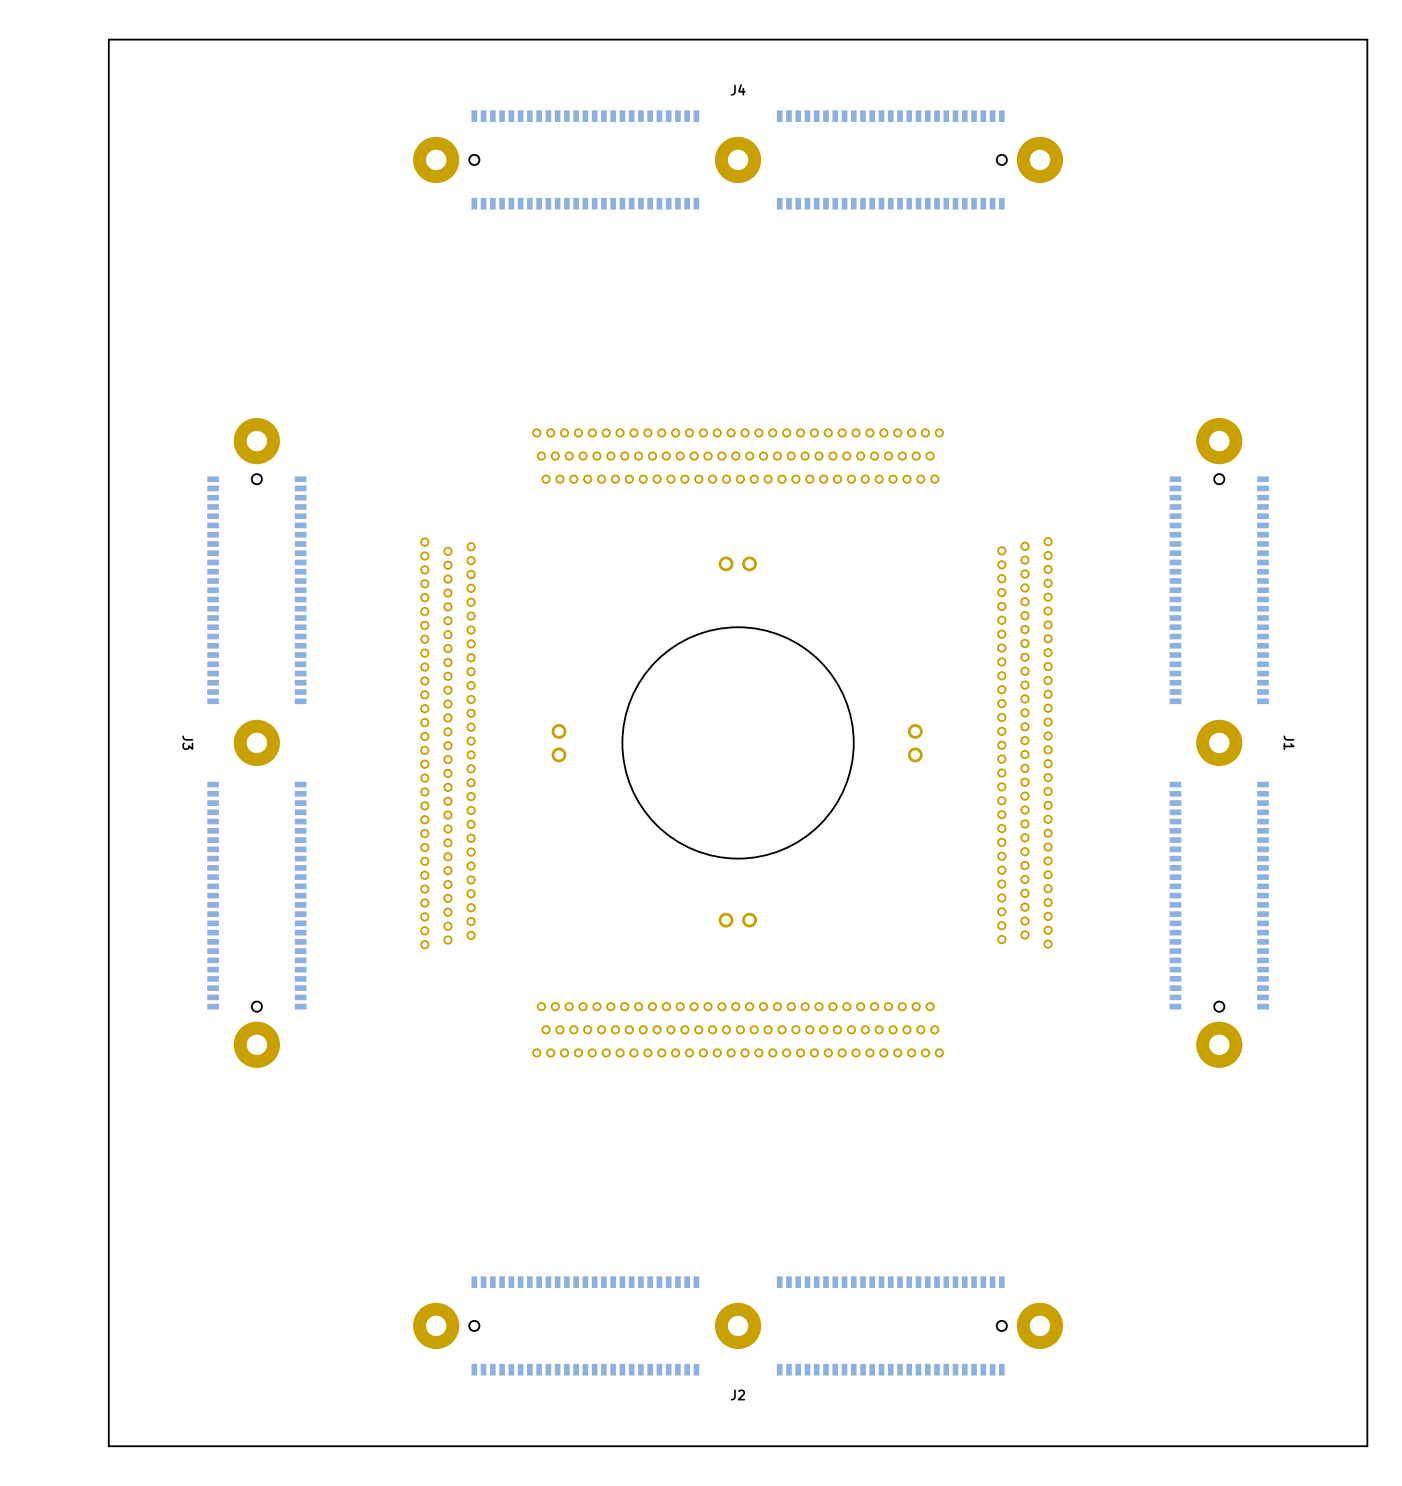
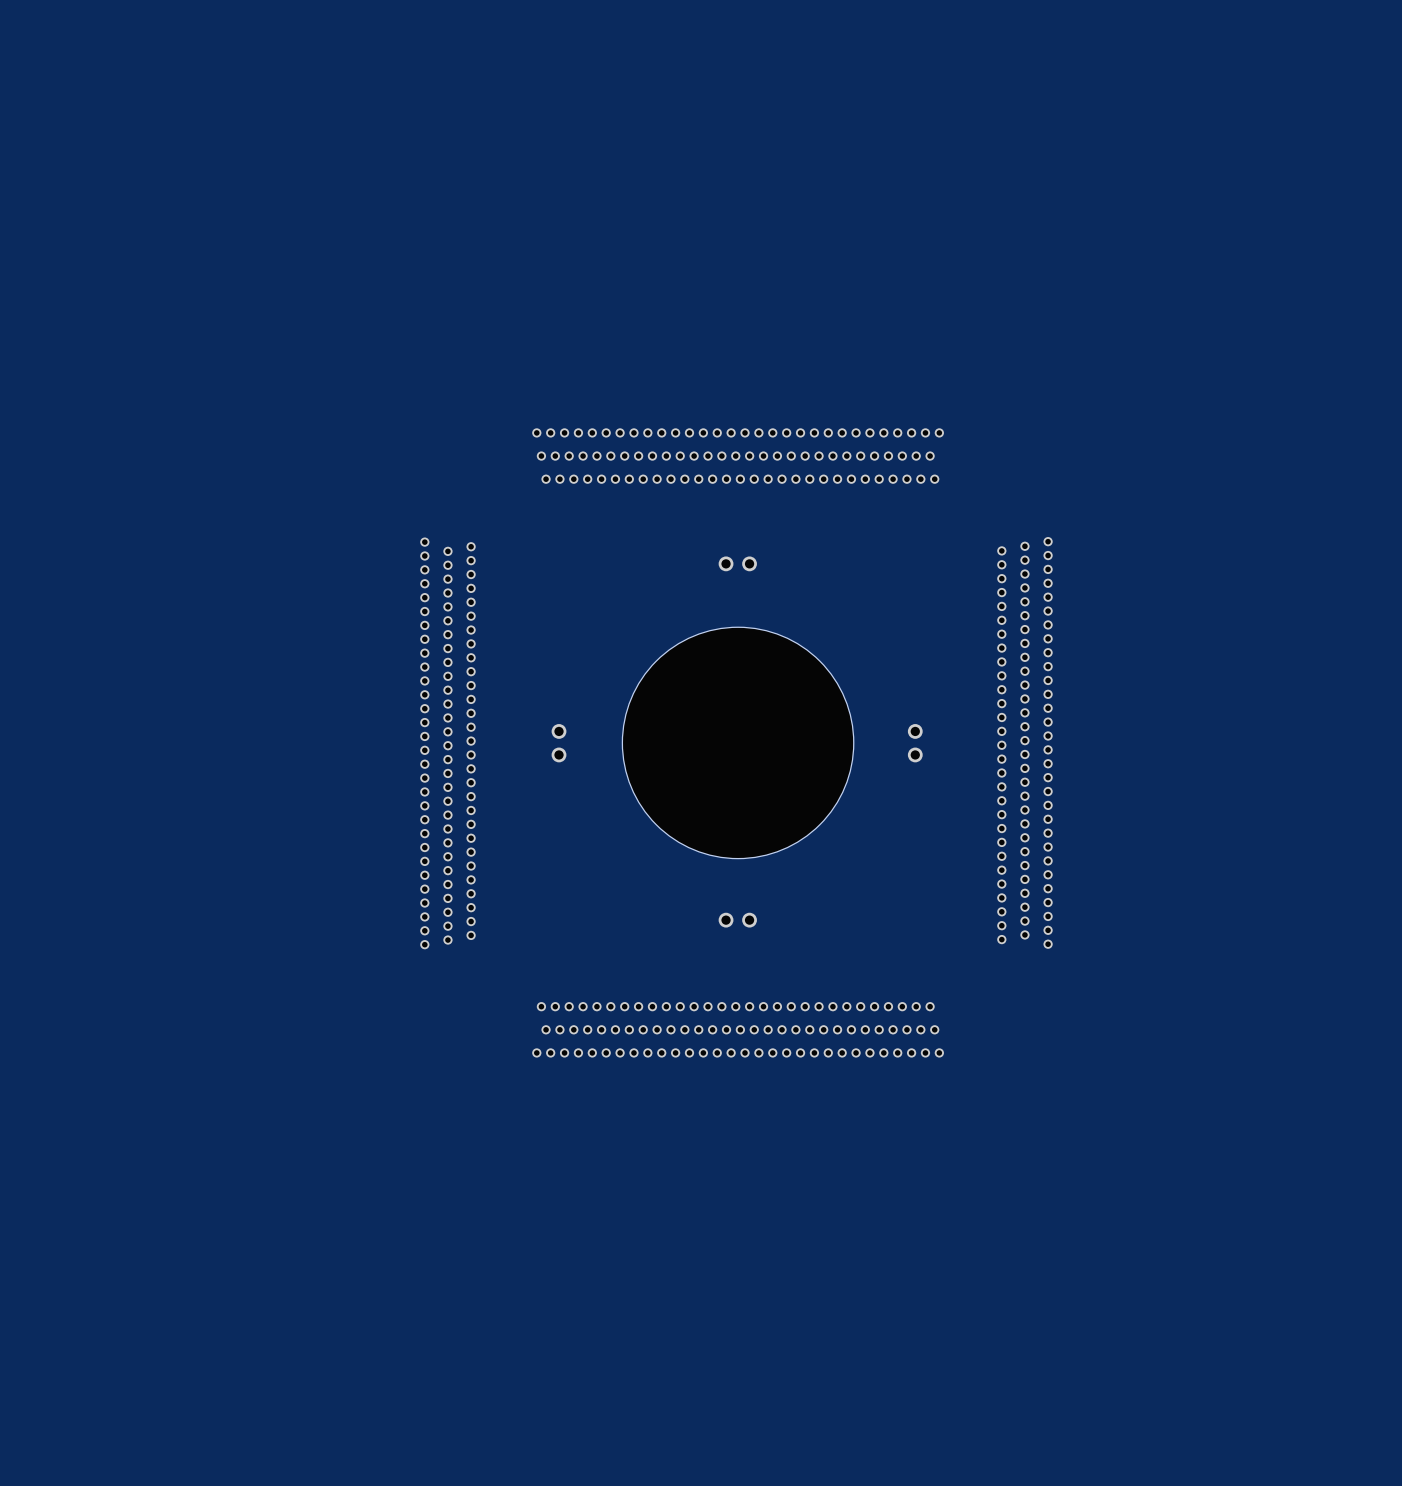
board edge: (1367, 39) (108, 39) (108, 1446) (1367, 1446) (1367, 39) -> none
J4: (738, 159) -> none
J3: (256, 742) -> none
J1: (1219, 742) -> none
J2: (738, 1325) -> none

